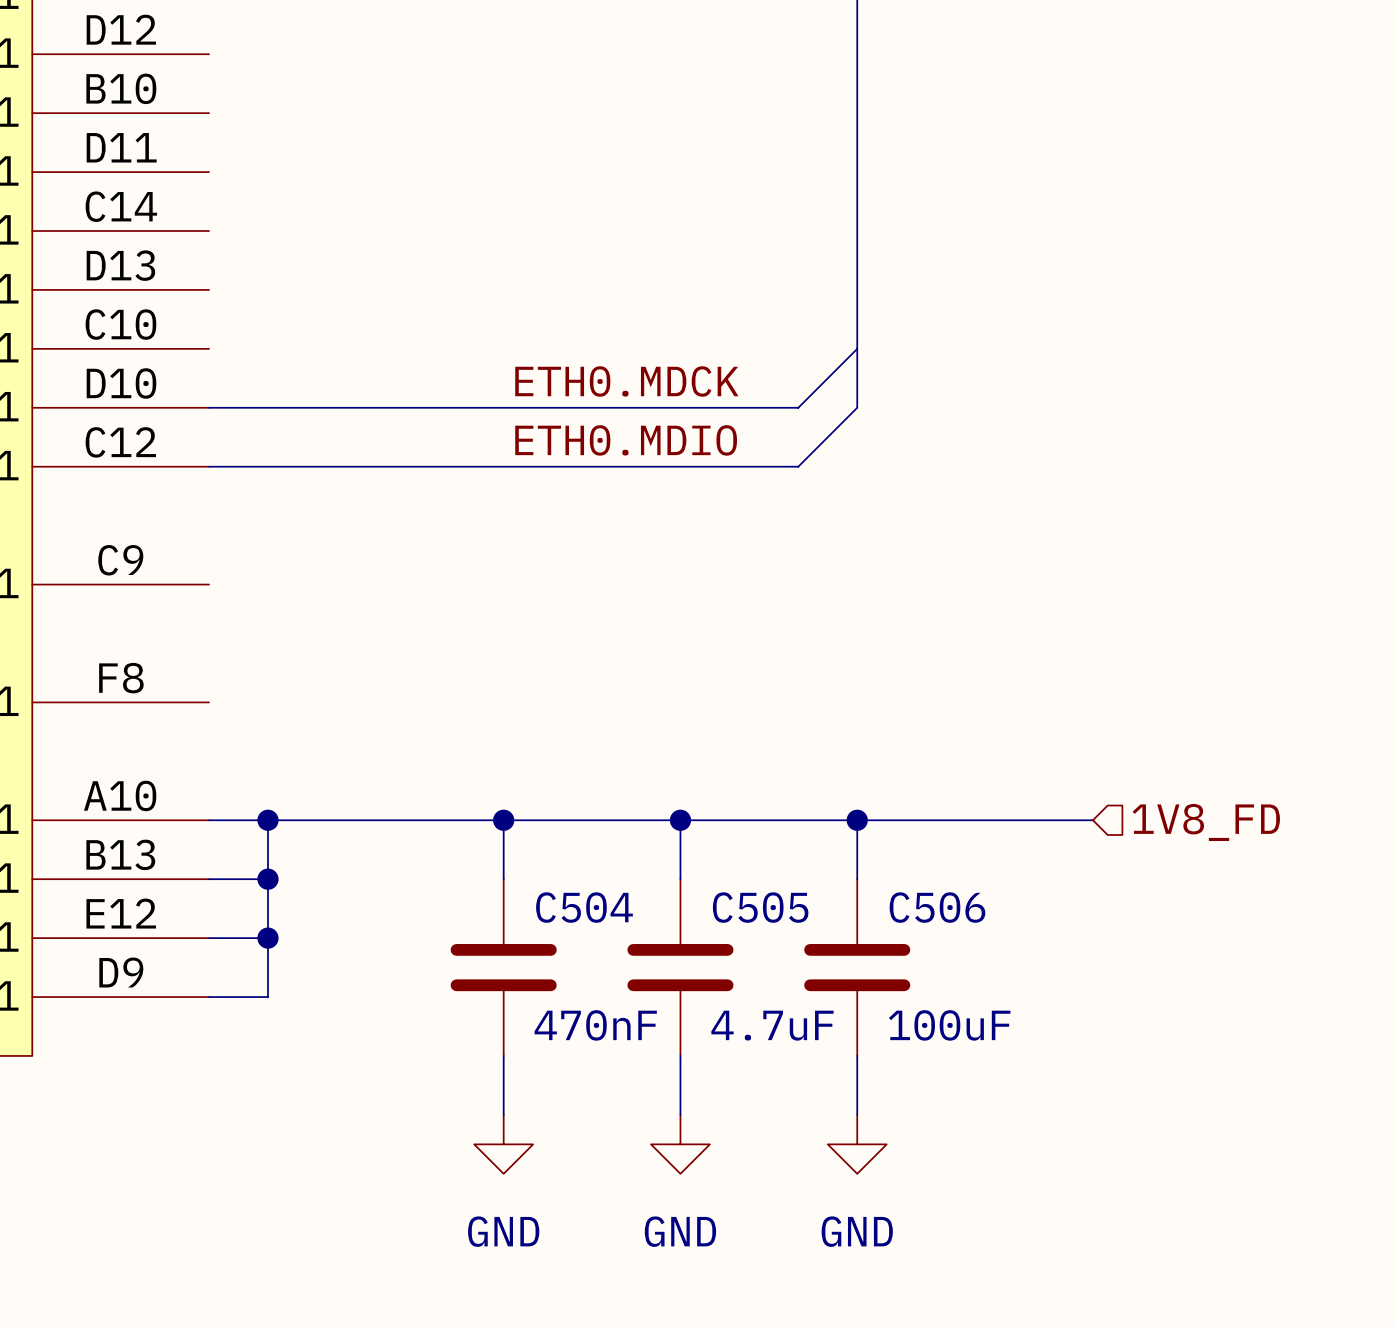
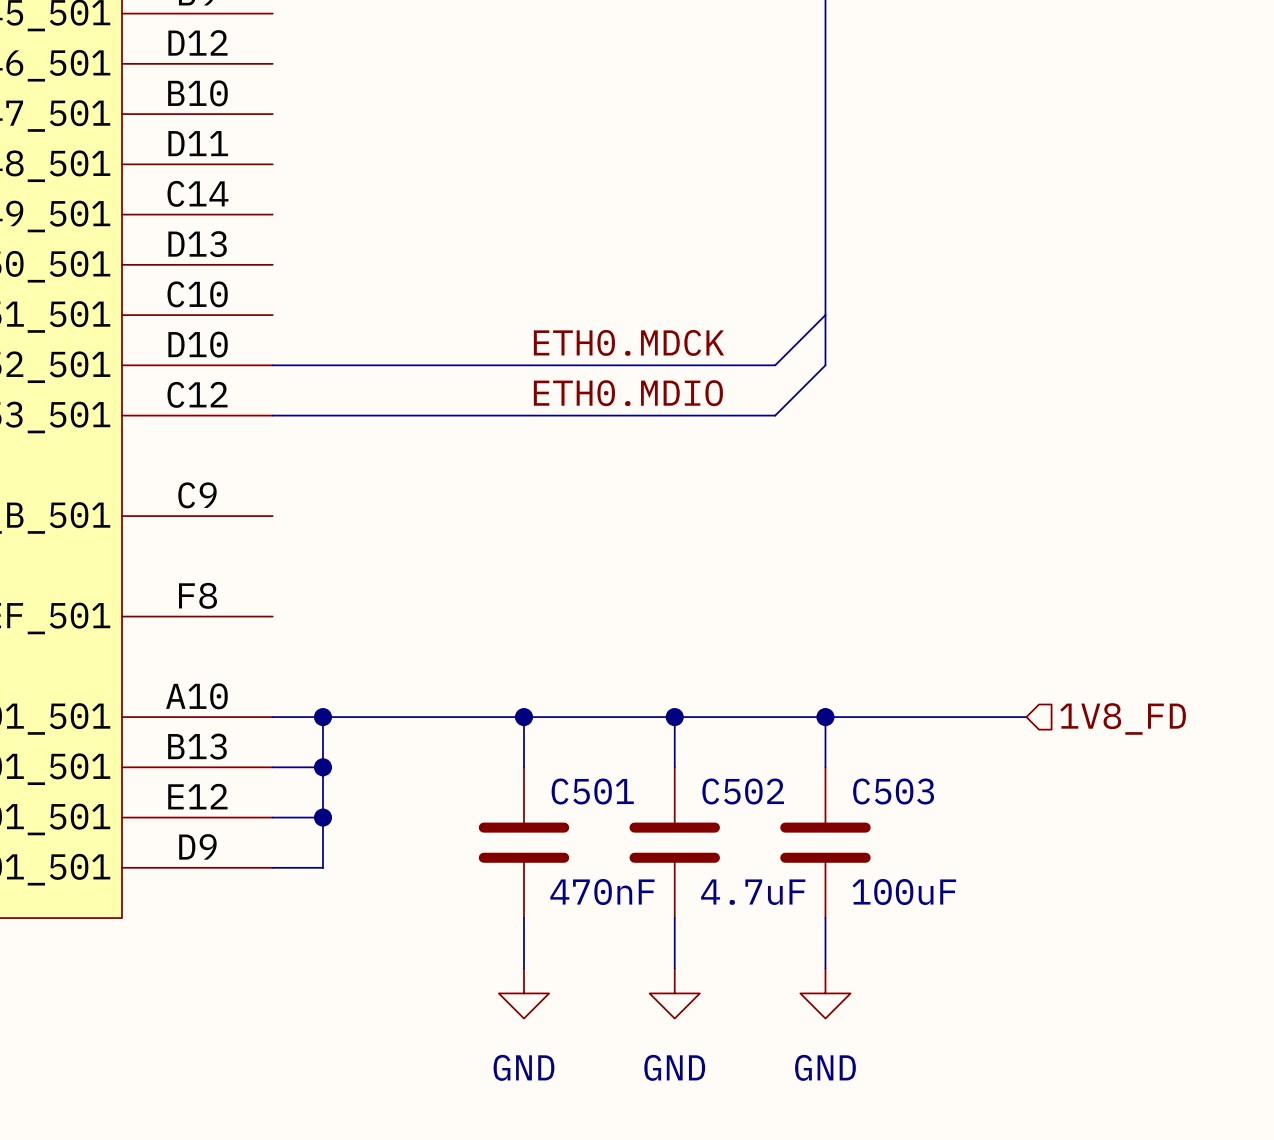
C504 name: C504 (584, 907) -> C501 (592, 791)
C505 name: C505 (760, 907) -> C502 (743, 791)
C506 name: C506 (937, 907) -> C503 (893, 791)

